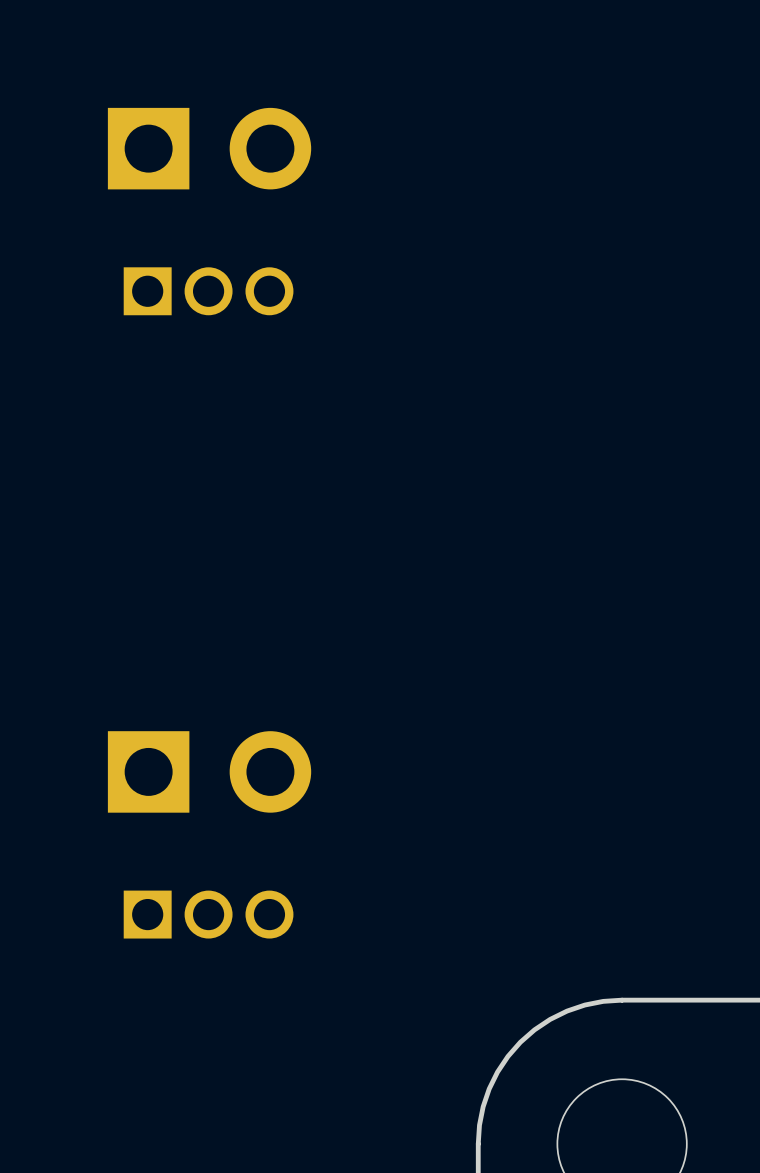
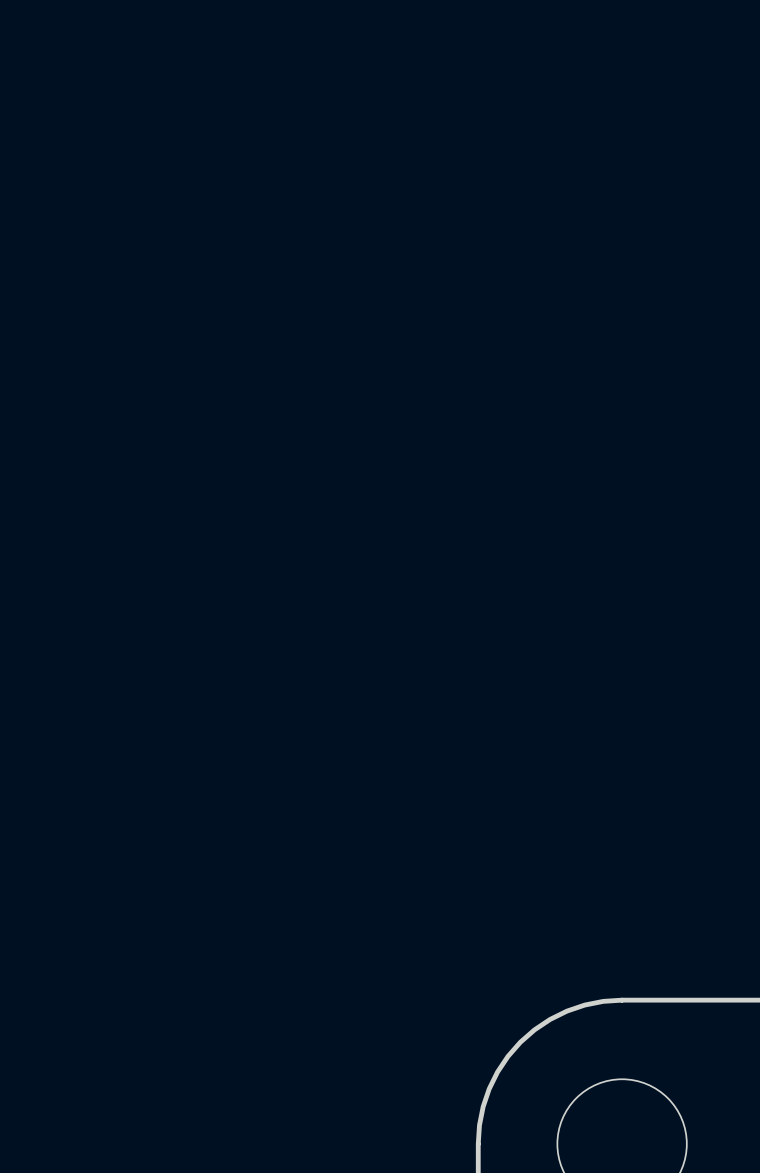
part: (209, 148) -> none
part: (208, 291) -> none
part: (209, 771) -> none
part: (208, 914) -> none

